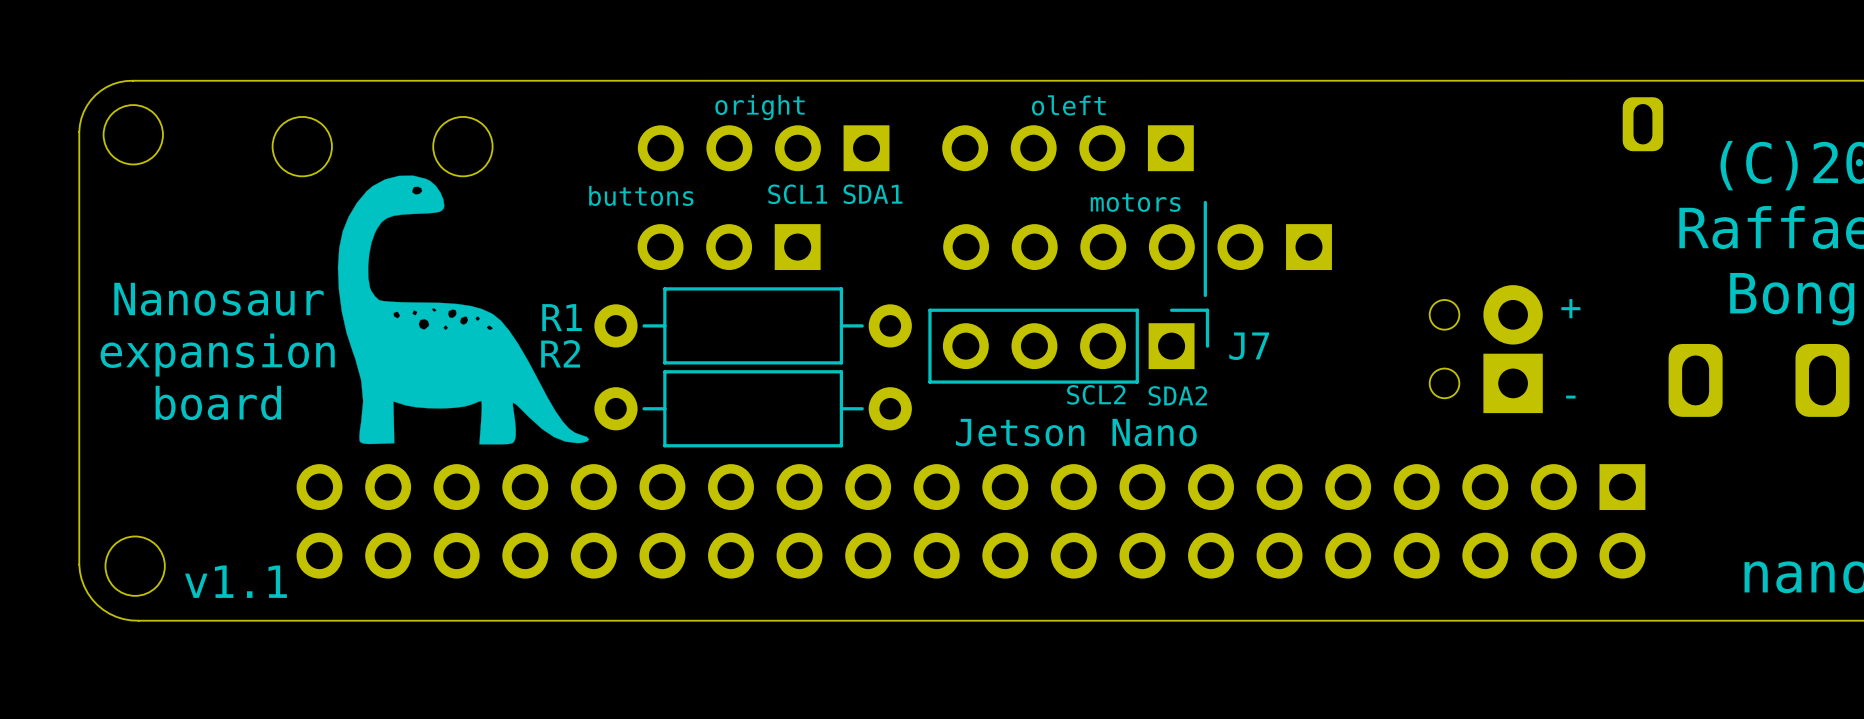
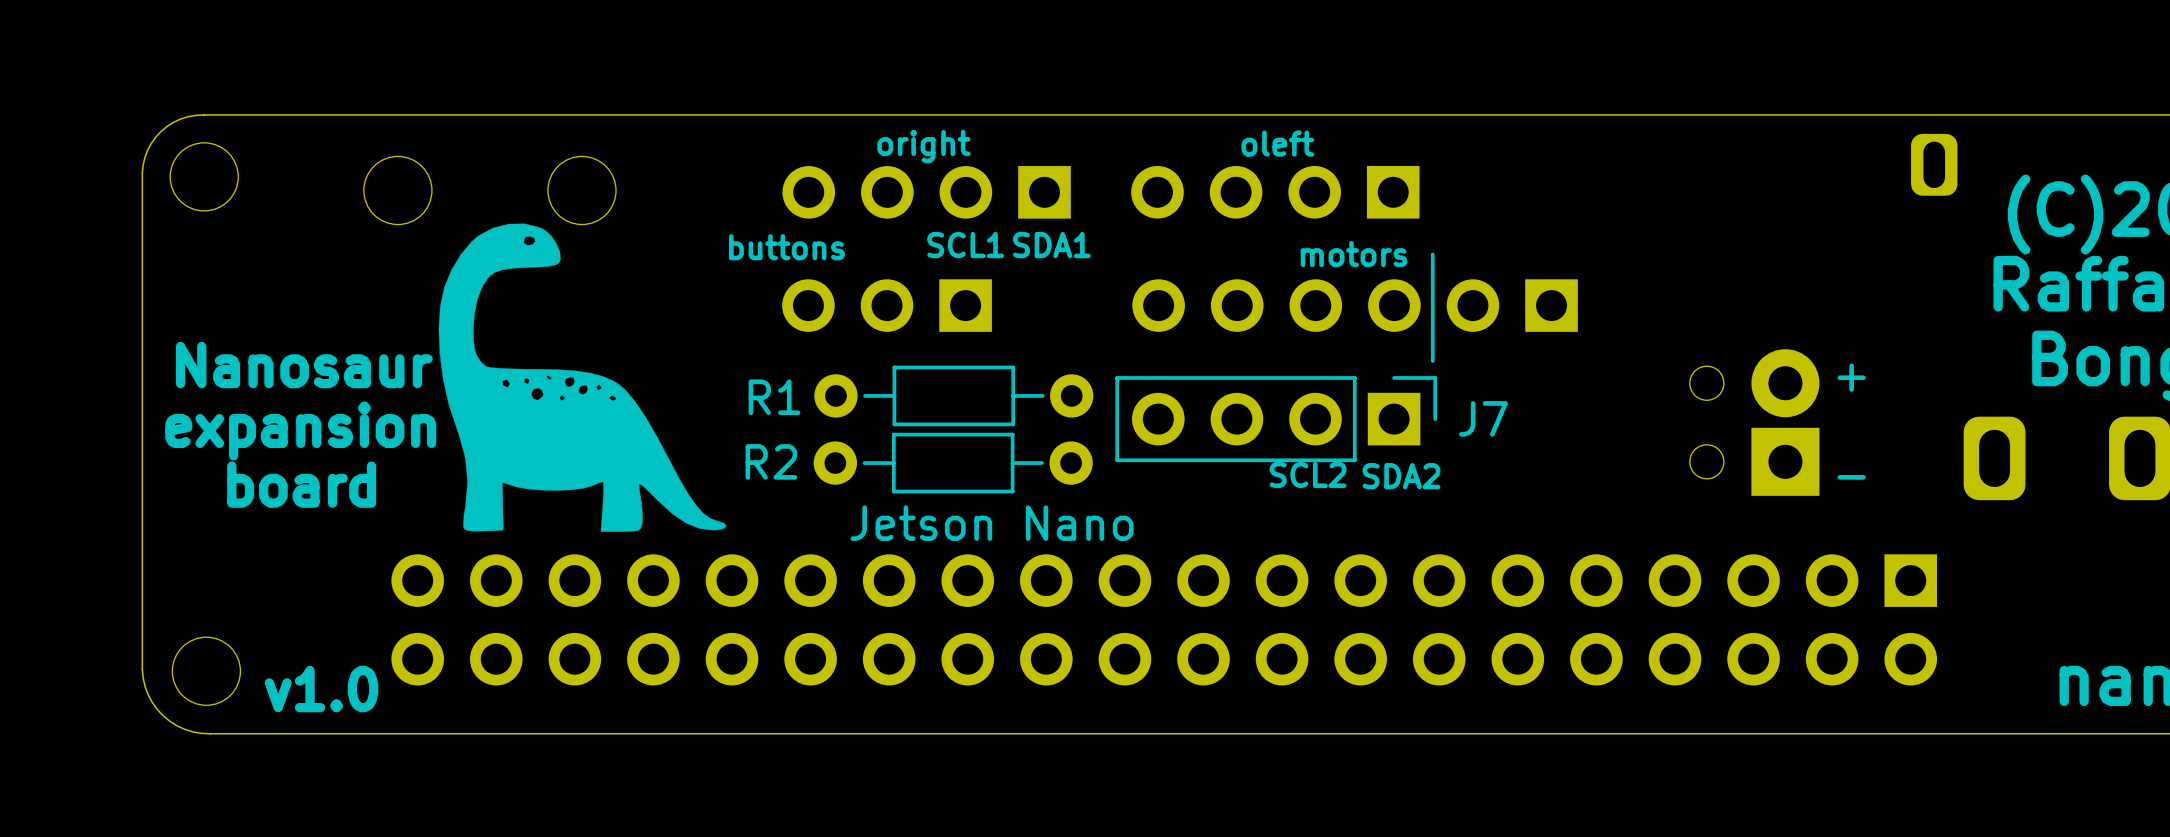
R1 footprint: [594, 287, 912, 365] -> [814, 365, 1094, 427]
R2 name position: R2 (560, 353) -> R2 (771, 461)
R2 footprint: [594, 370, 912, 448] -> [813, 432, 1093, 494]
text position: Jetson Nano (1076, 432) -> Jetson Nano (992, 523)
text: v1.1 (235, 581) -> v1.0 (321, 689)

